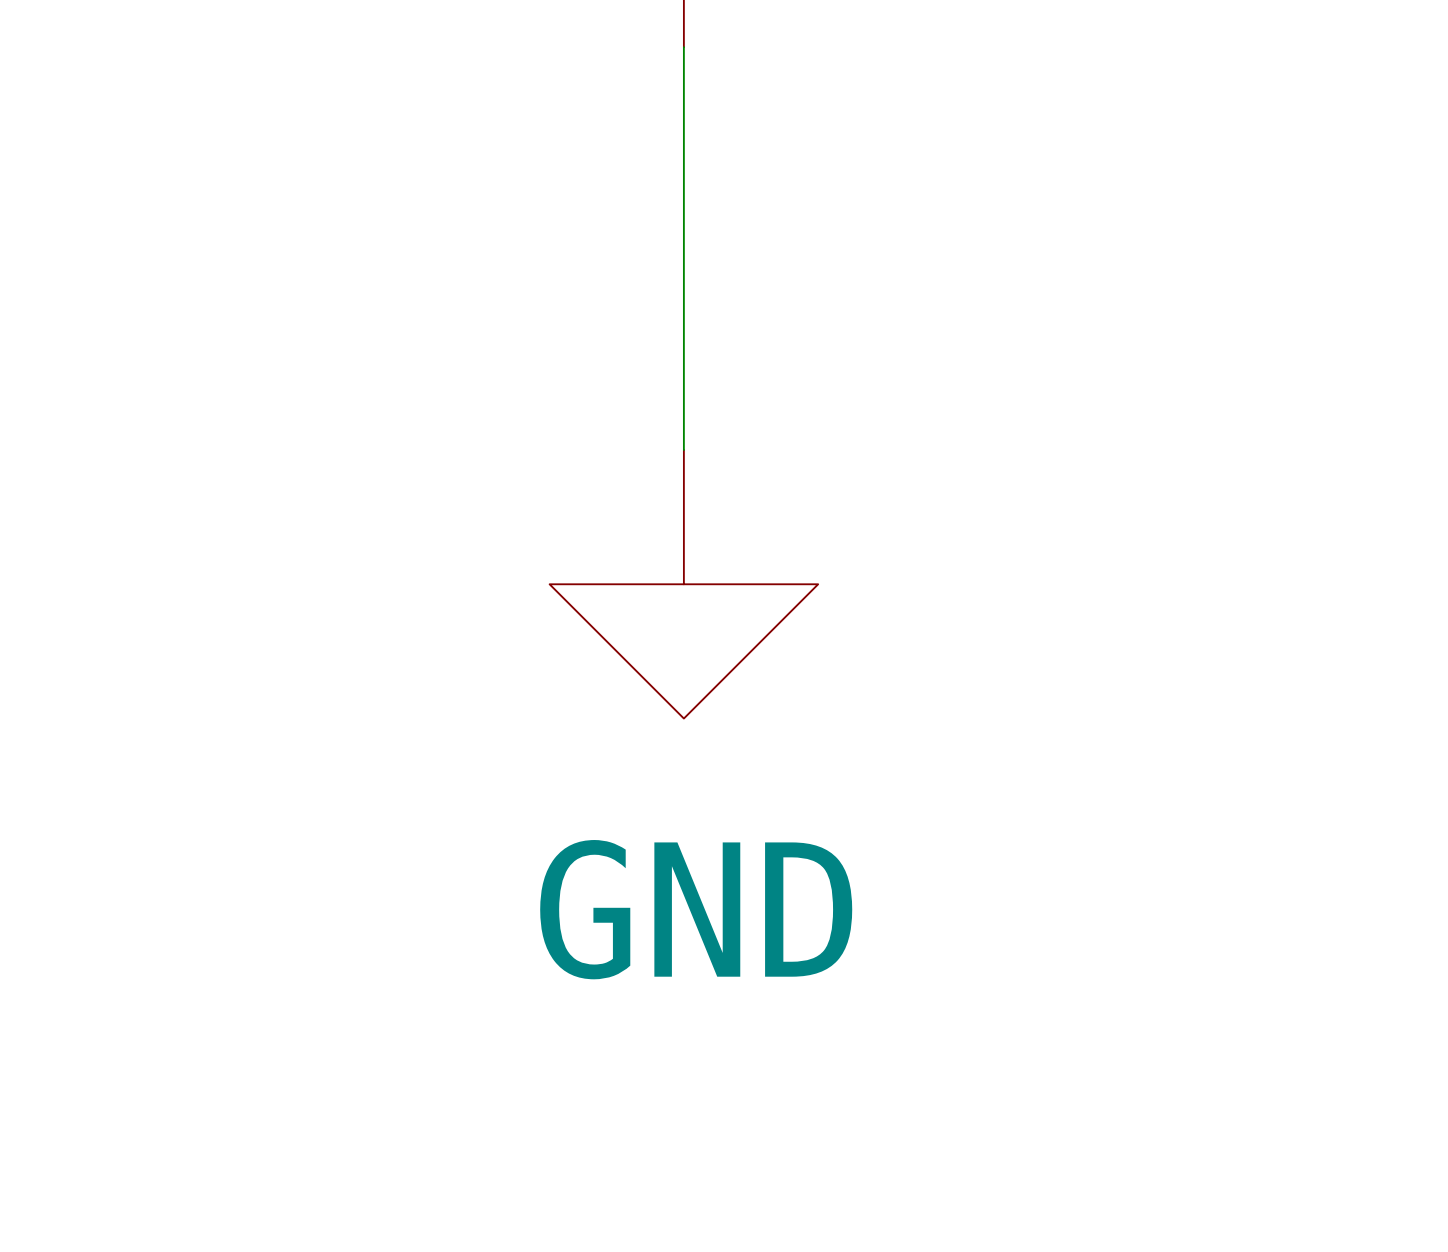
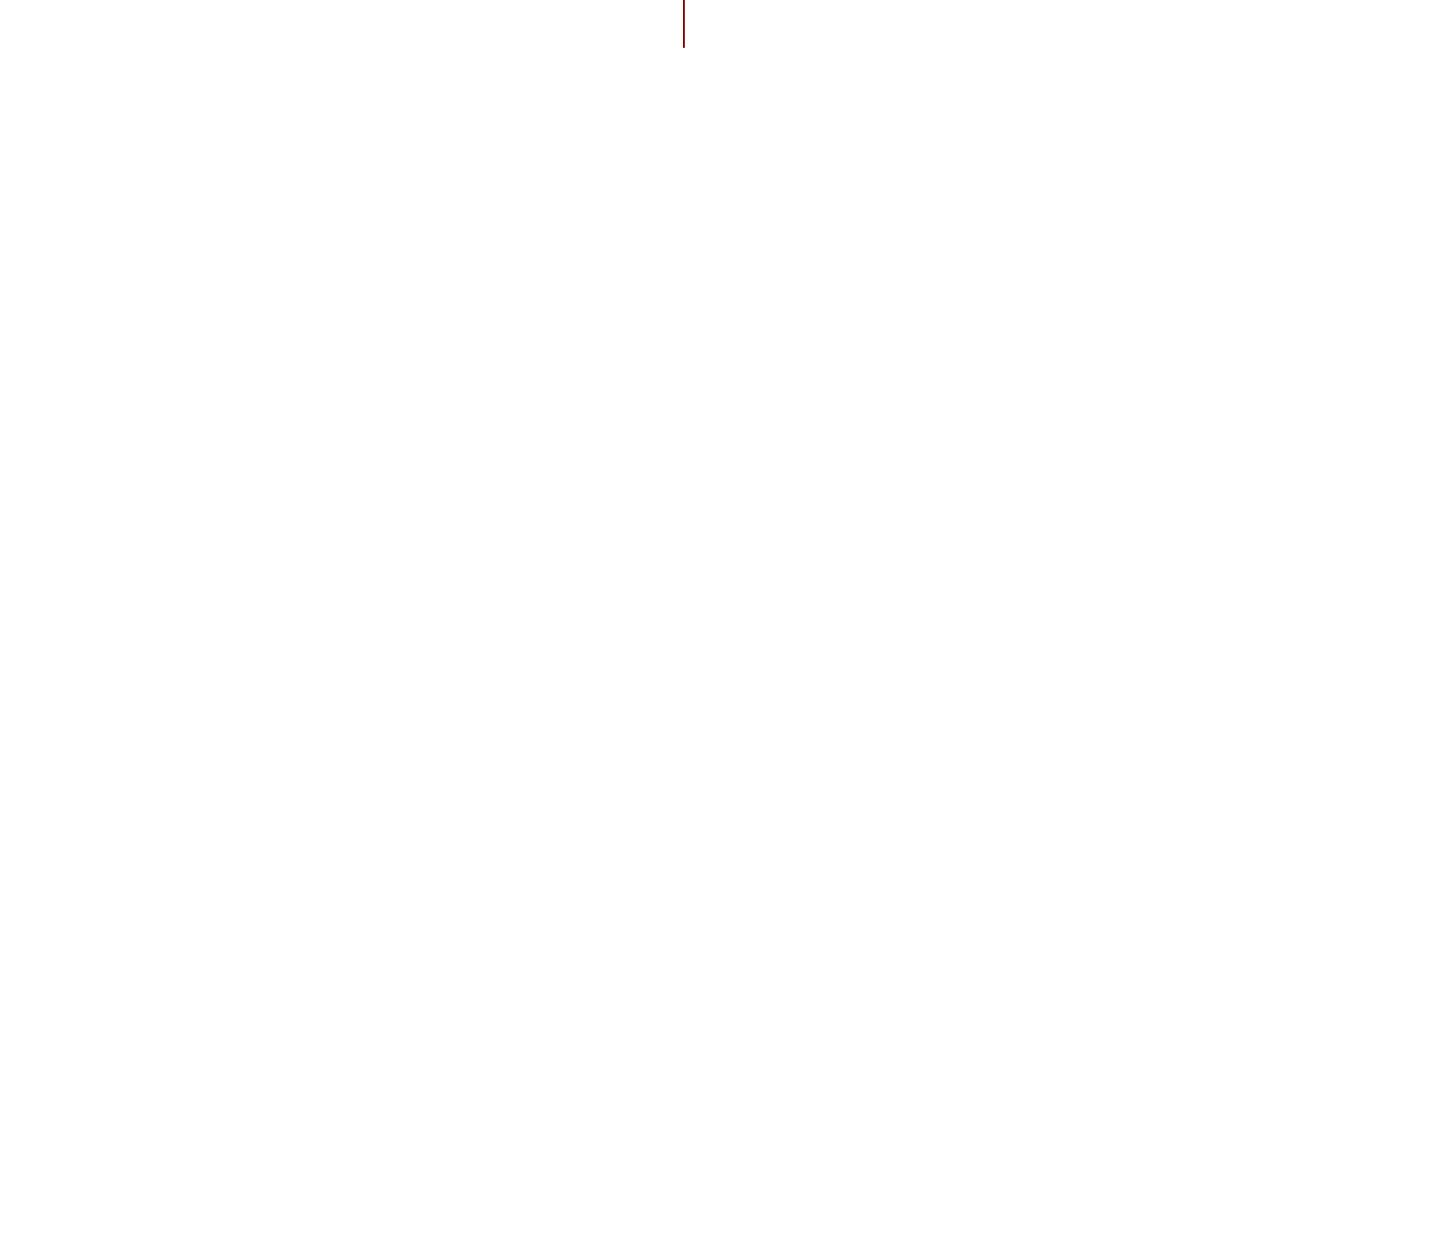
wire: (683, 47) (683, 450) -> none
power symbol: GND (683, 584) -> none

